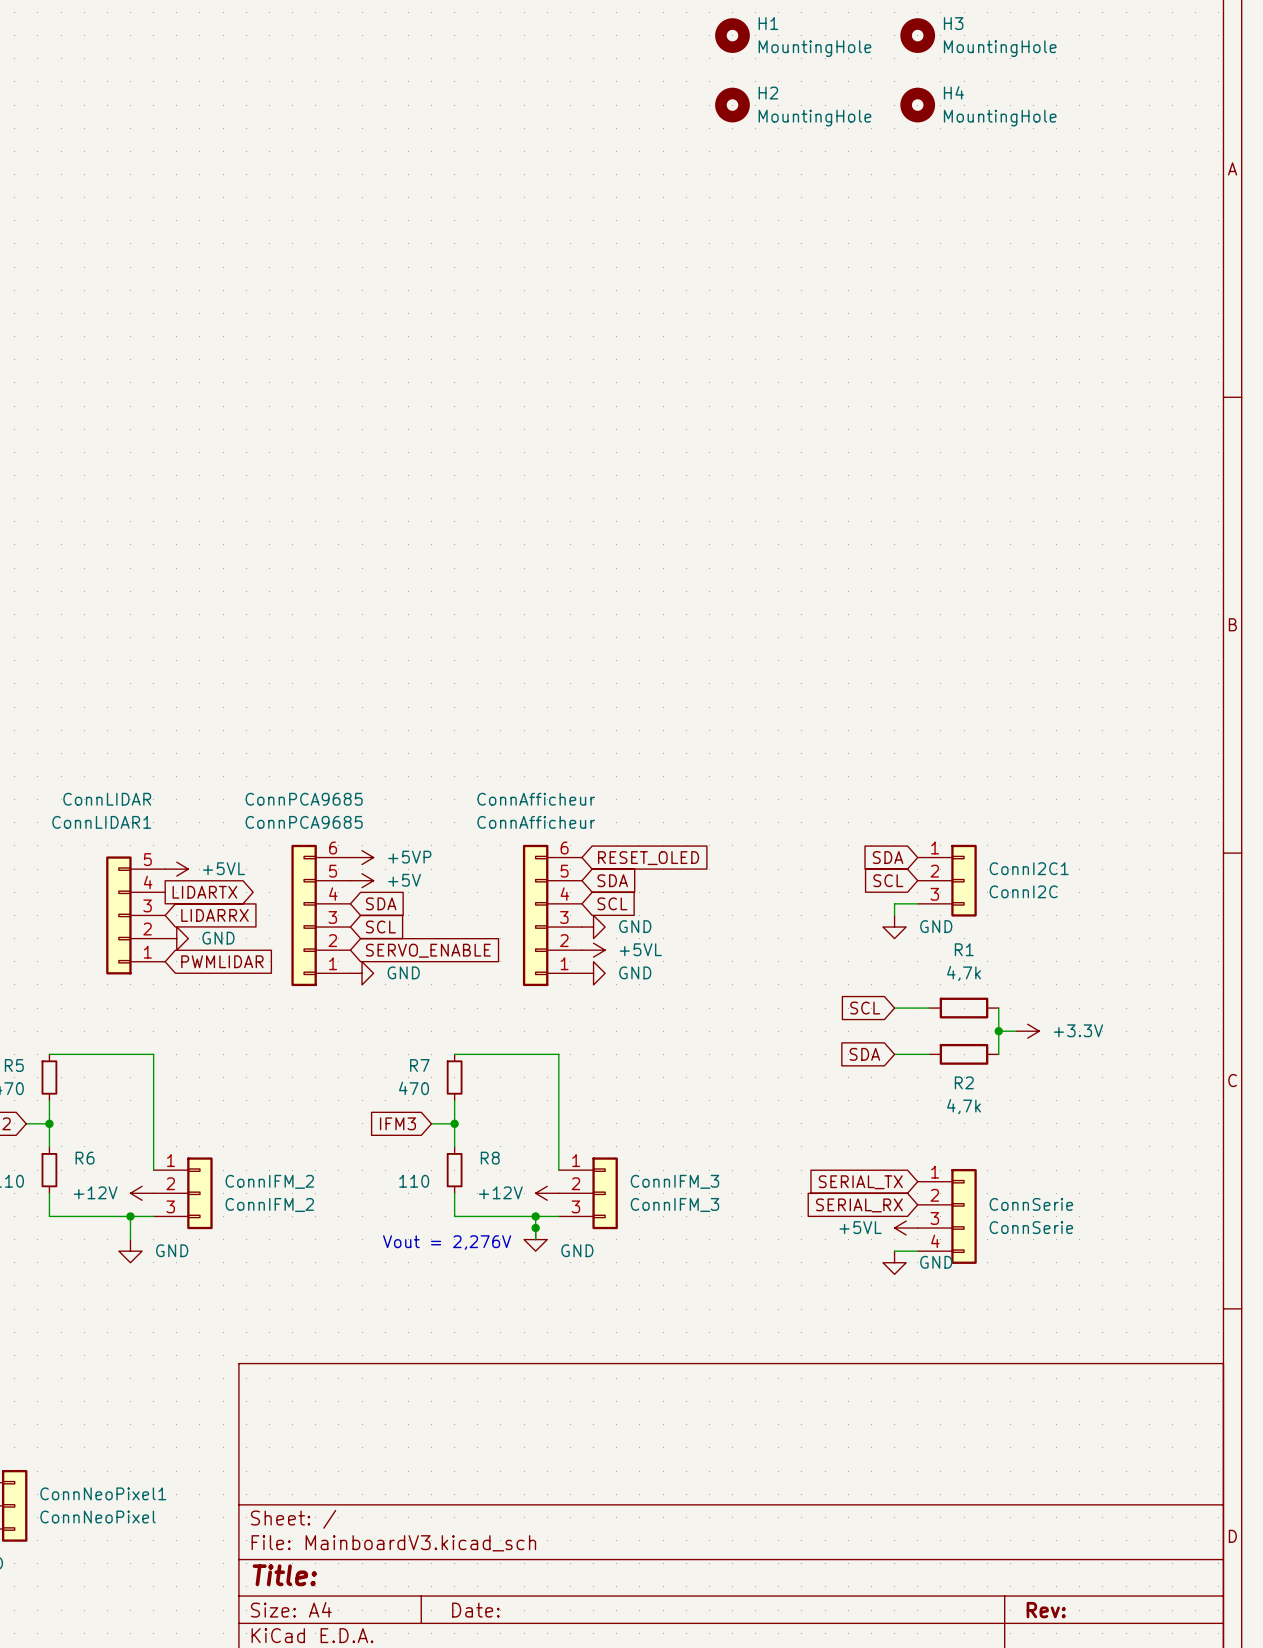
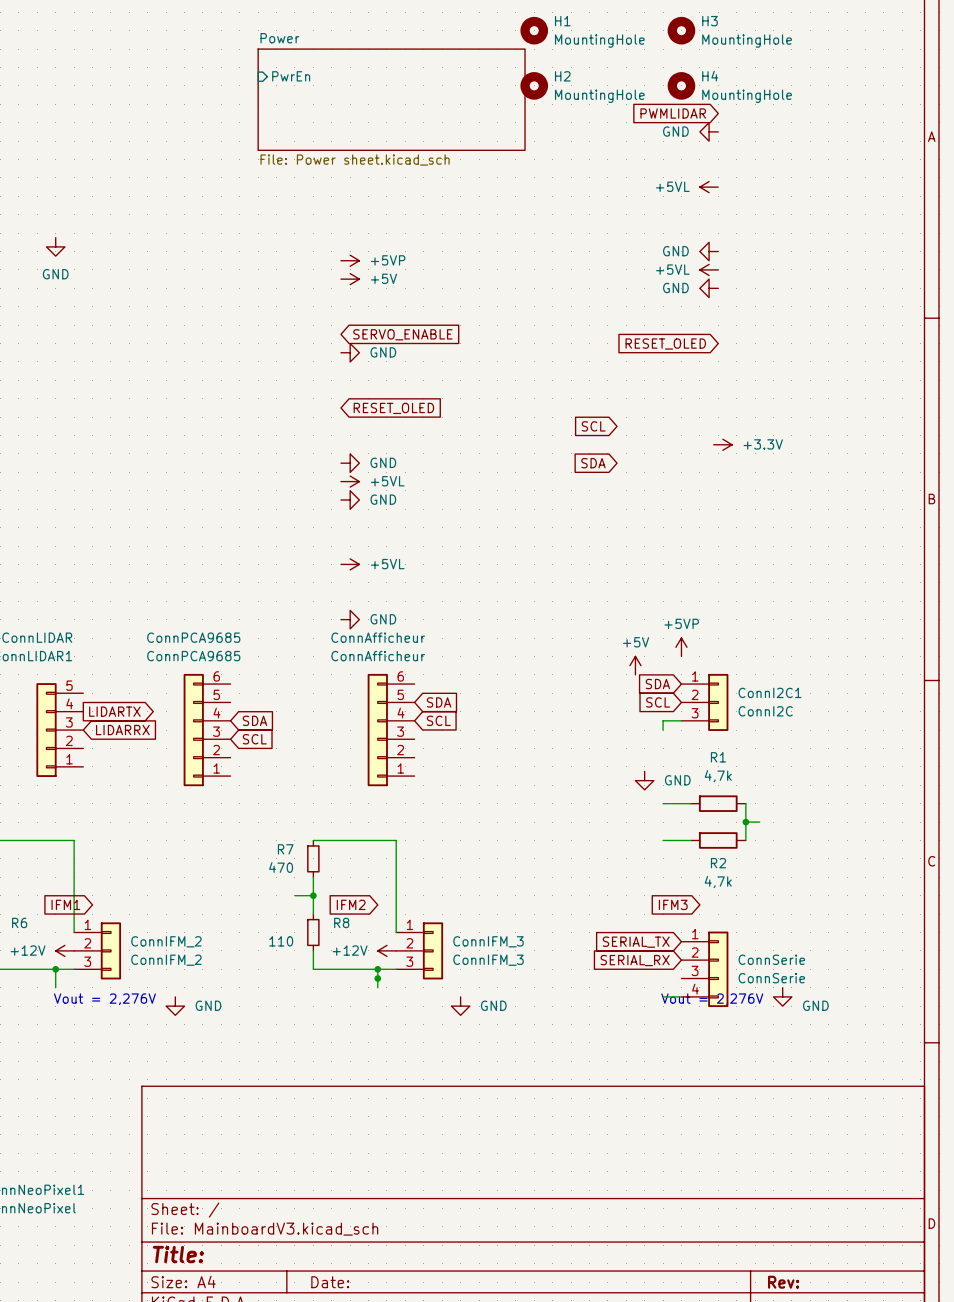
sheet pin: none -> PwrEn (291, 76)
sheet Power: none -> File: Power sheet.kicad_sch (391, 99)
global label: none -> PWMLIDAR (673, 113)
power symbol: none -> GND (709, 131)
power symbol: none -> +5VL (709, 187)
power symbol: none -> GND (55, 246)
power symbol: none -> GND (709, 251)
power symbol: none -> +5VP (350, 260)
power symbol: none -> +5VL (709, 269)
power symbol: none -> +5V (350, 279)
power symbol: none -> GND (709, 288)
global label: none -> SERVO_ENABLE (402, 334)
global label: none -> RESET_OLED (665, 343)
power symbol: none -> GND (350, 352)
global label: none -> RESET_OLED (393, 408)
global label: none -> SCL (593, 426)
power symbol: none -> +3.3V (722, 444)
power symbol: none -> GND (350, 463)
global label: none -> SDA (593, 463)
power symbol: none -> +5VL (350, 481)
power symbol: none -> GND (350, 499)
power symbol: none -> +5VL (350, 564)
power symbol: none -> GND (350, 619)
power symbol: none -> +5VP (681, 647)
power symbol: none -> +5V (635, 665)
power symbol: +5VP (362, 857) -> none
global label: RESET_OLED (648, 858) -> none
power symbol: +5VL (176, 869) -> none
power symbol: +5V (362, 880) -> none
power symbol: GND (593, 927) -> none
power symbol position: GND (894, 927) -> GND (644, 780)
power symbol: GND (176, 938) -> none
global label: SERVO_ENABLE (428, 950) -> none
power symbol: +5VL (593, 950) -> none
global label: PWMLIDAR (222, 961) -> none
power symbol: GND (362, 973) -> none
power symbol: GND (593, 973) -> none
global label: SCL (865, 1008) -> none
power symbol: +3.3V (1027, 1031) -> none
global label: SDA (864, 1054) -> none
global label: IFM3 (397, 1123) -> none
global label: none -> IFM1 (65, 904)
global label: none -> IFM2 (351, 904)
global label: none -> IFM3 (673, 904)
power symbol: +5VL (906, 1228) -> none
power symbol position: GND (535, 1239) -> GND (460, 1006)
text: Vout = 2,276V (447, 1242) -> none
power symbol text position: GND (577, 1250) -> GND (493, 1005)
power symbol: GND (130, 1251) -> none
power symbol: none -> GND (782, 996)
text: none -> Vout = 2,276V (104, 999)
text: none -> Vout = 2,276V (712, 999)
power symbol: none -> GND (175, 1006)
power symbol: GND (894, 1262) -> none

